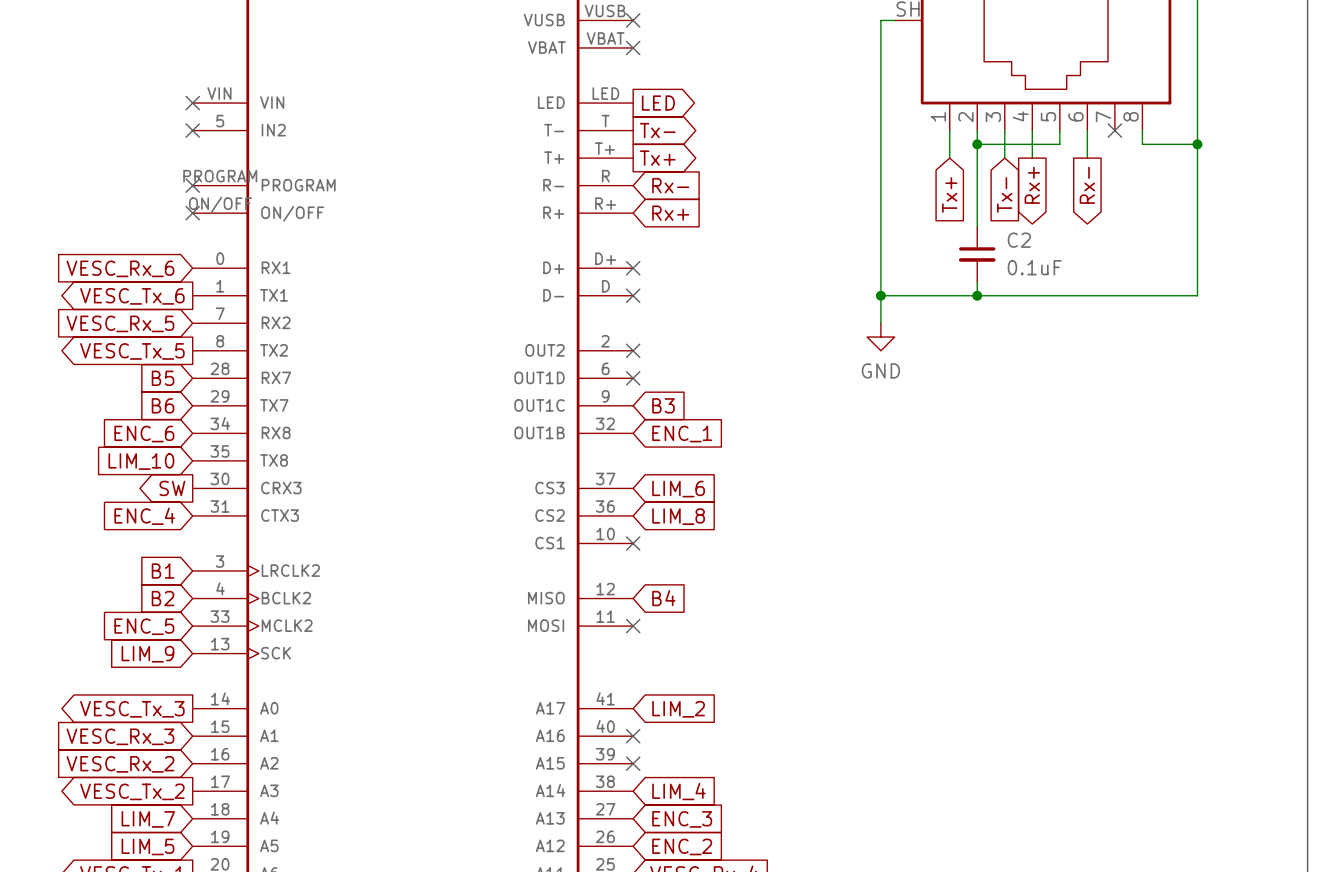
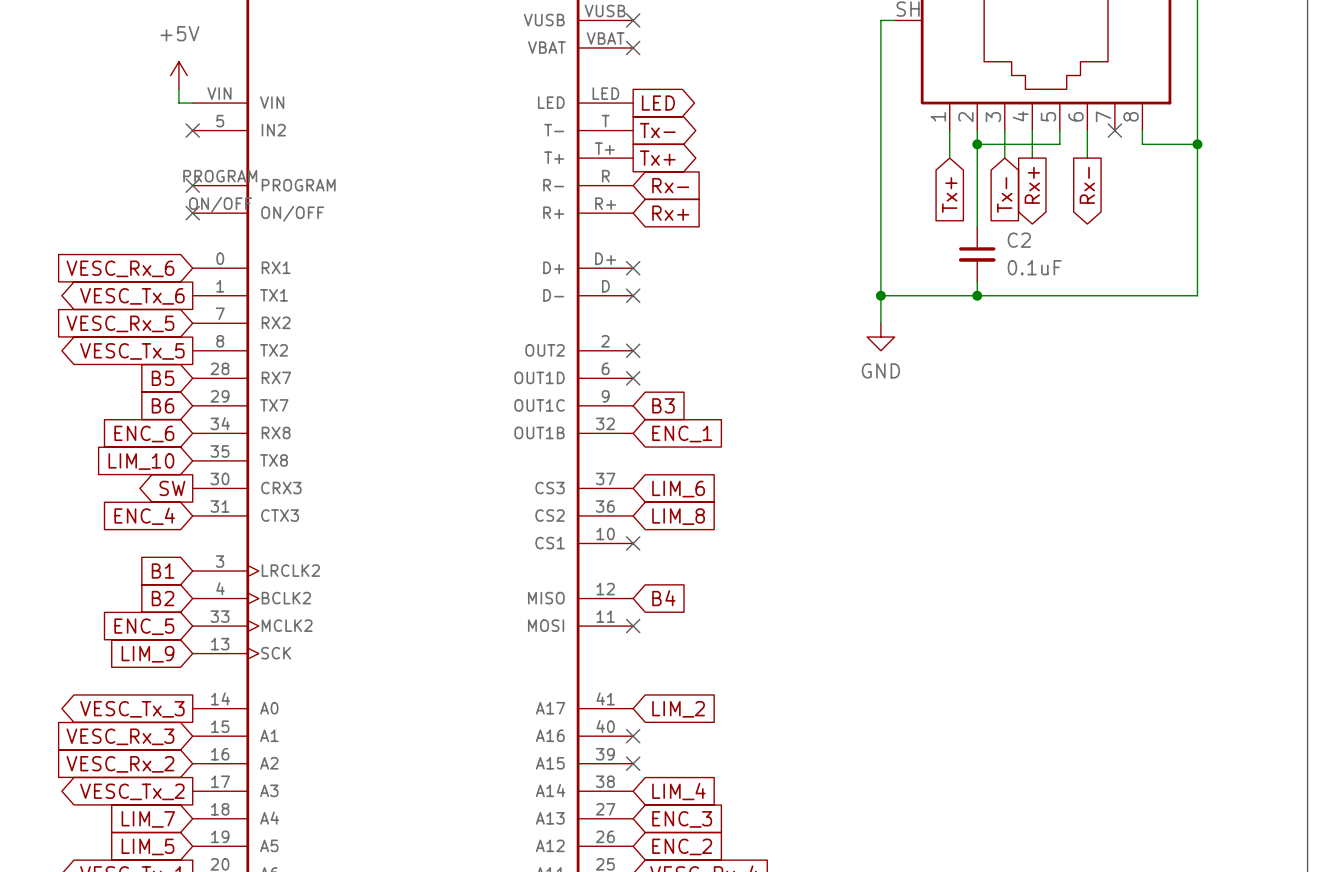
power symbol: none -> +5V (178, 75)
wire: none -> (178, 89) (178, 103) (192, 103)
no-connect mark: (192, 103) -> none

